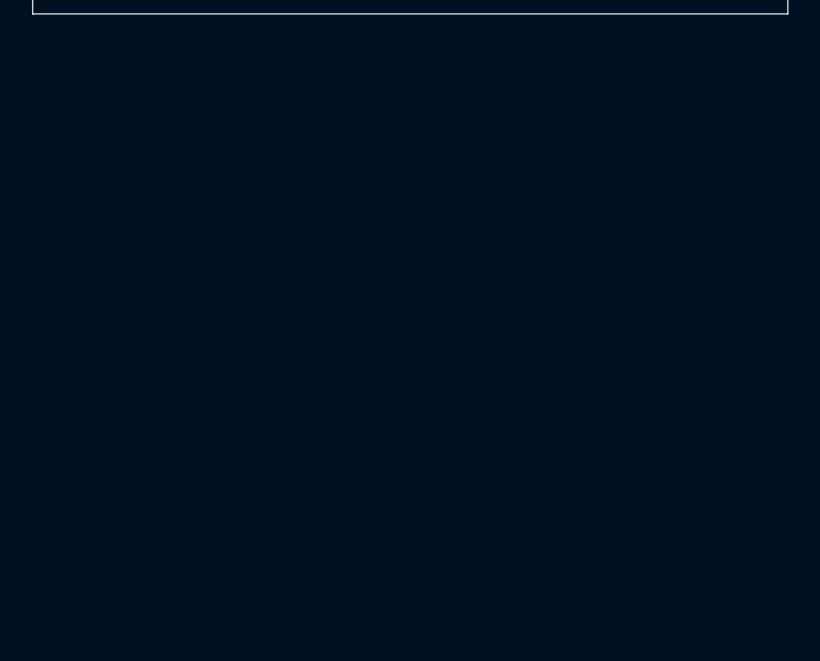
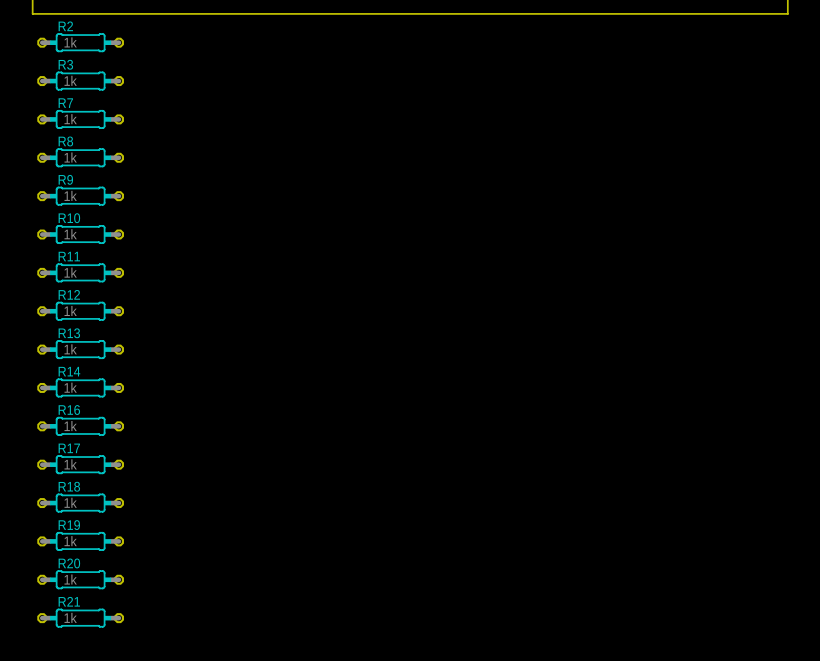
R2: none -> 1k (80, 42)
R3: none -> 1k (80, 81)
R7: none -> 1k (80, 119)
R8: none -> 1k (80, 157)
R9: none -> 1k (80, 196)
R10: none -> 1k (80, 234)
R11: none -> 1k (80, 272)
R12: none -> 1k (80, 311)
R13: none -> 1k (80, 349)
R14: none -> 1k (80, 387)
R16: none -> 1k (80, 426)
R17: none -> 1k (80, 464)
R18: none -> 1k (80, 503)
R19: none -> 1k (80, 541)
R20: none -> 1k (80, 579)
R21: none -> 1k (80, 618)

